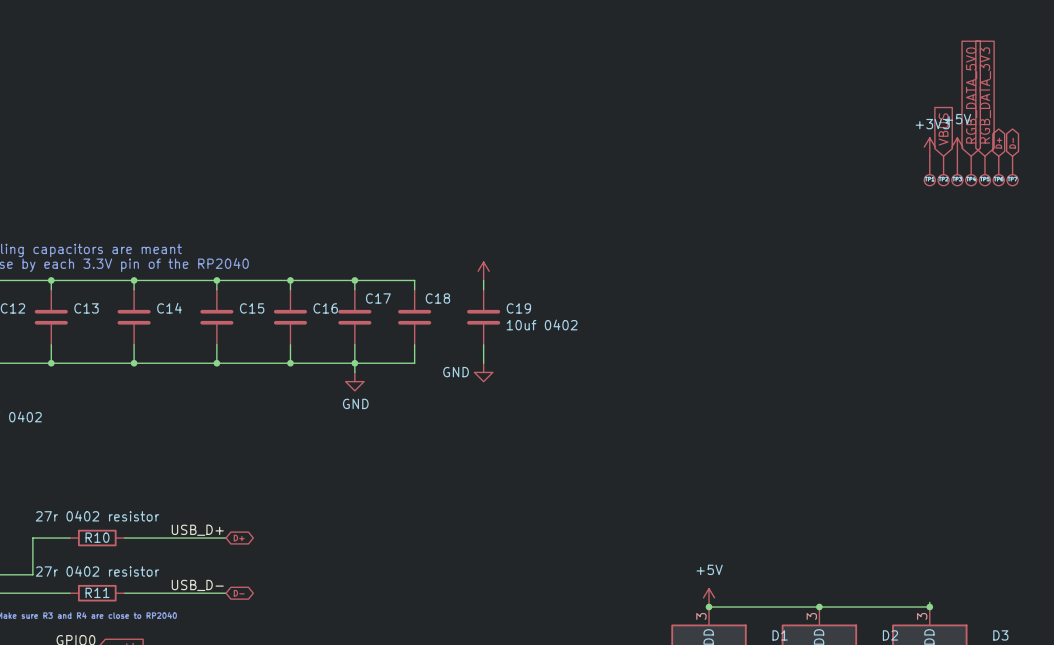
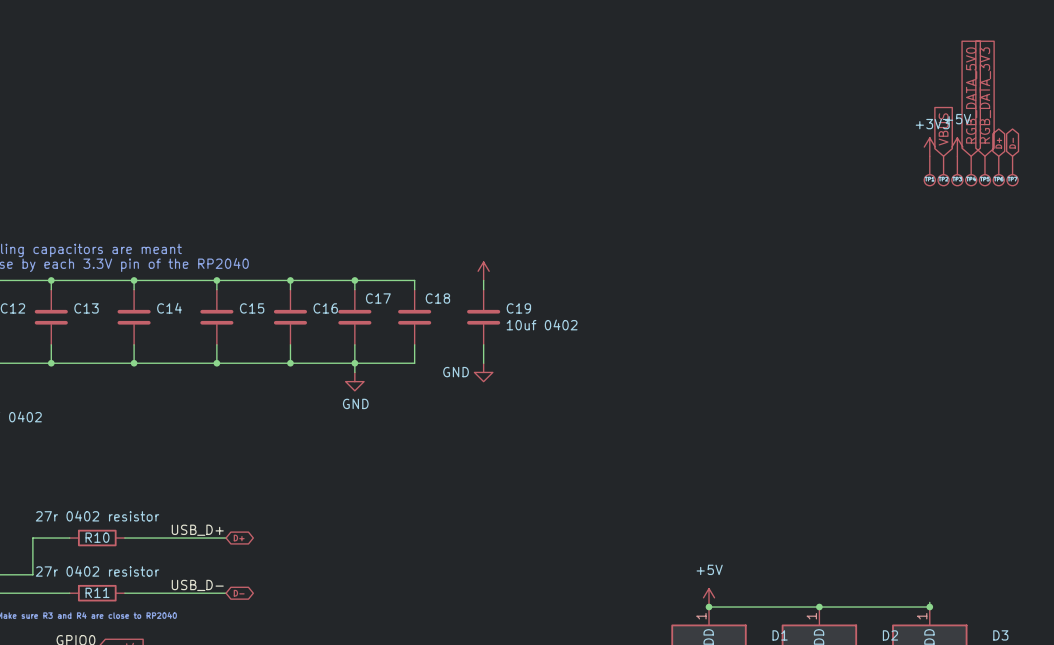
D1 pin number: 3 (701, 616) -> 1 (701, 616)
D2 pin number: 3 (811, 616) -> 1 (811, 616)
D3 pin number: 3 (922, 616) -> 1 (922, 616)

